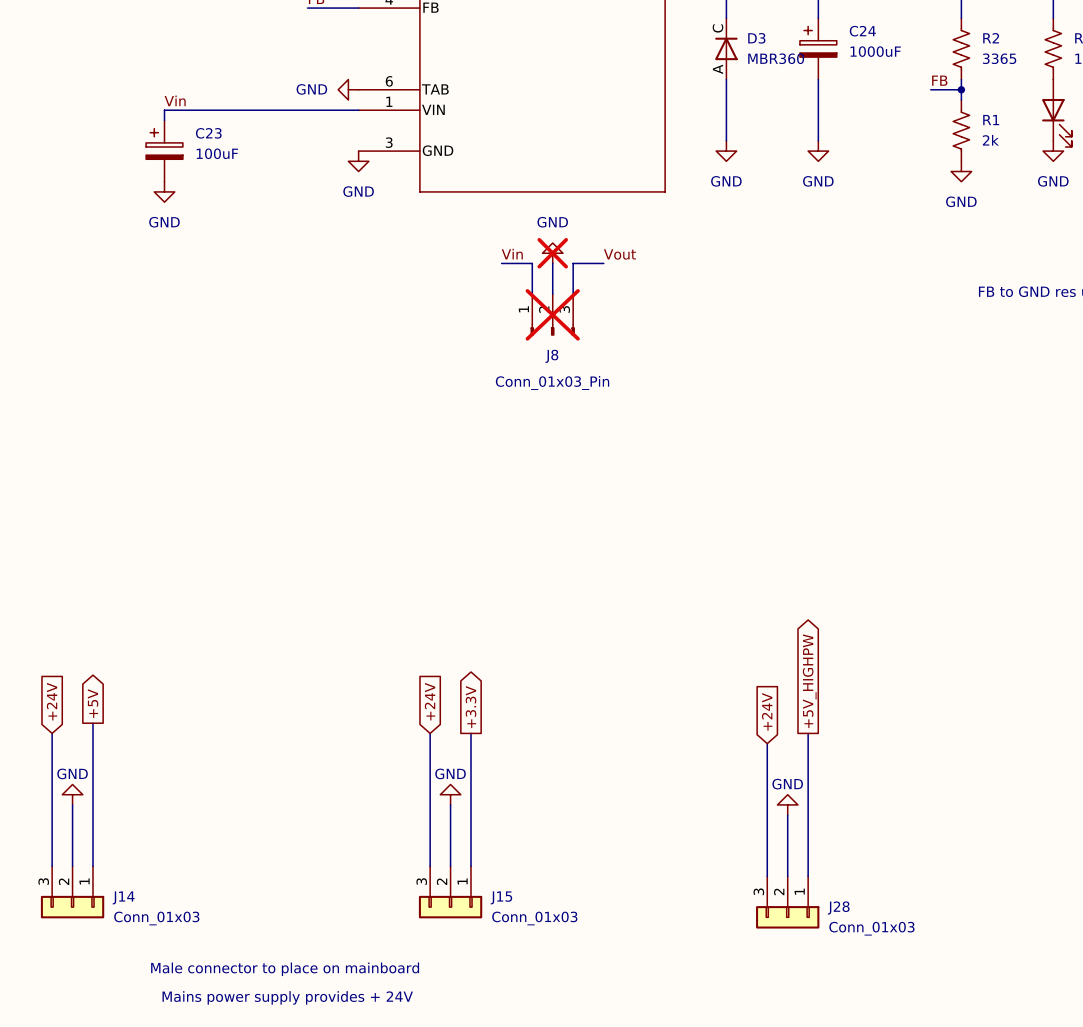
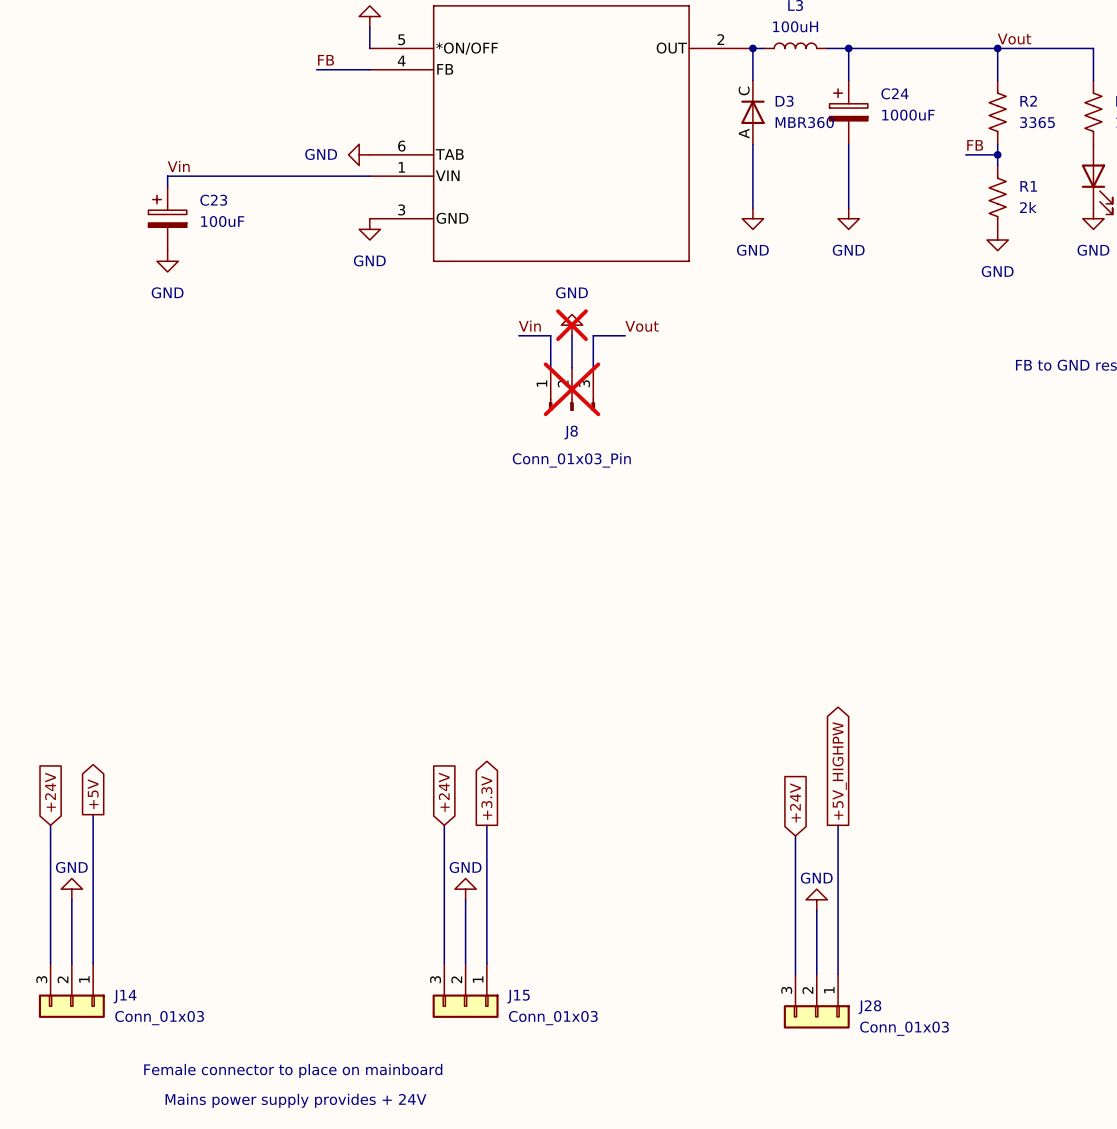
text: Male connector to place on mainboard (285, 969) -> Female connector to place on mainboard (293, 1070)

